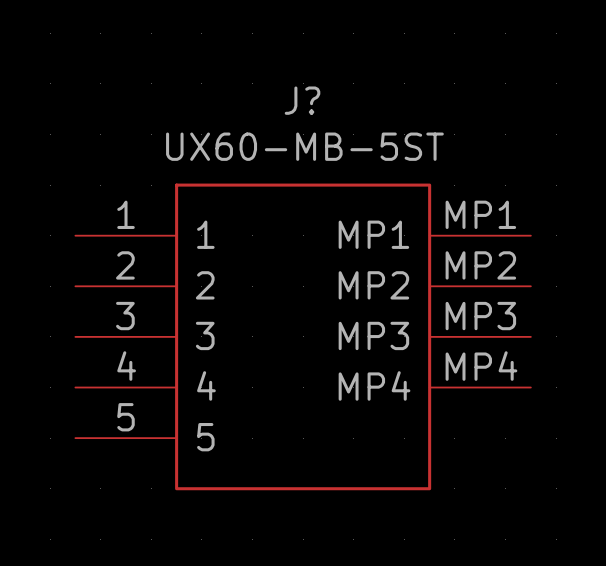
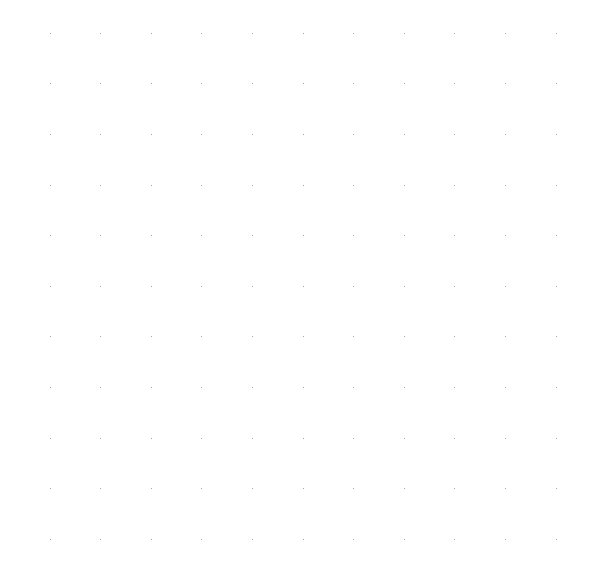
J?: UX60-MB-5ST (303, 336) -> none

